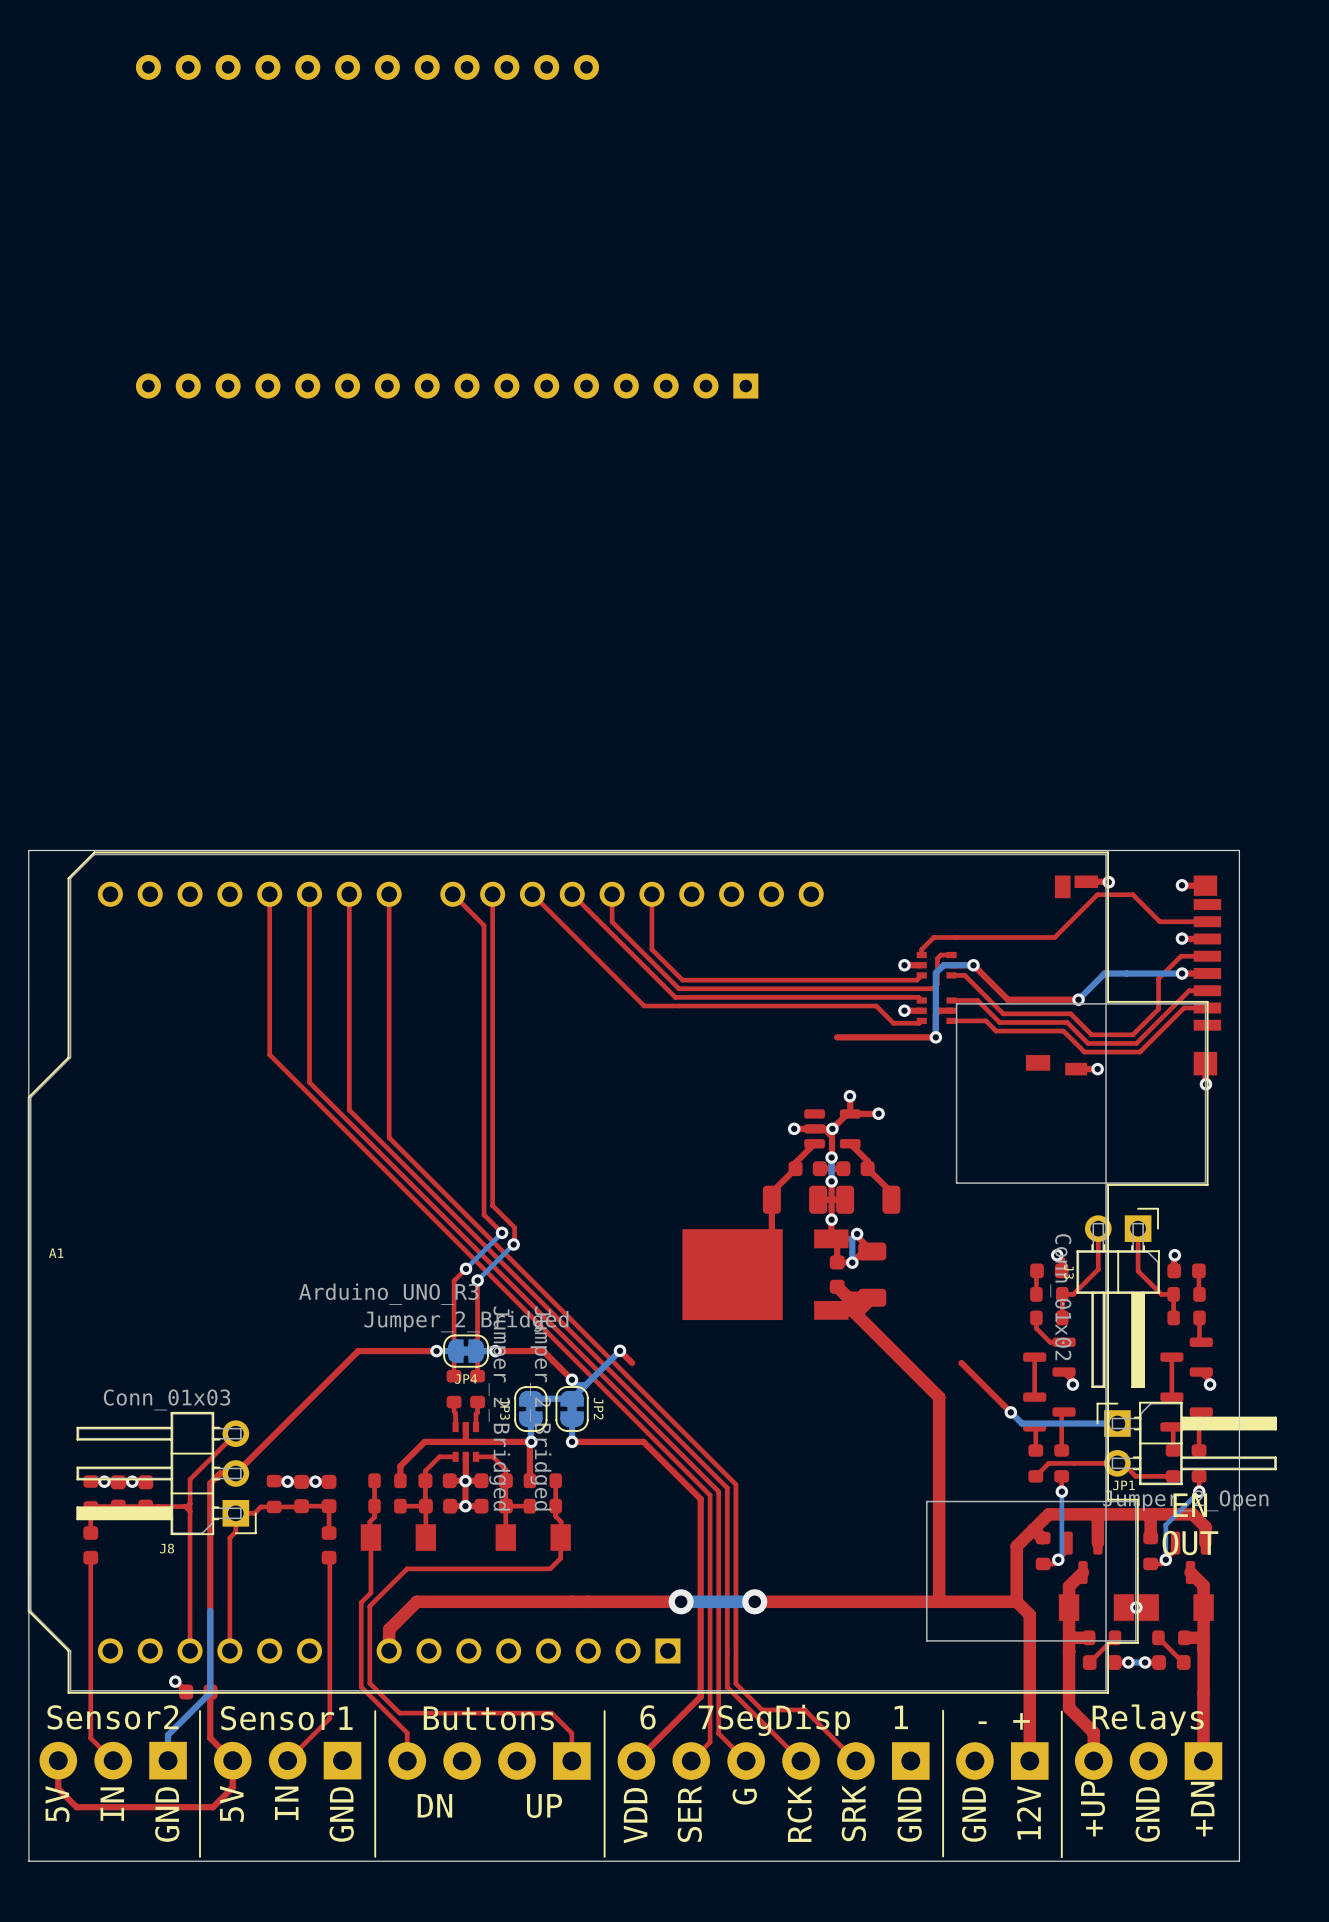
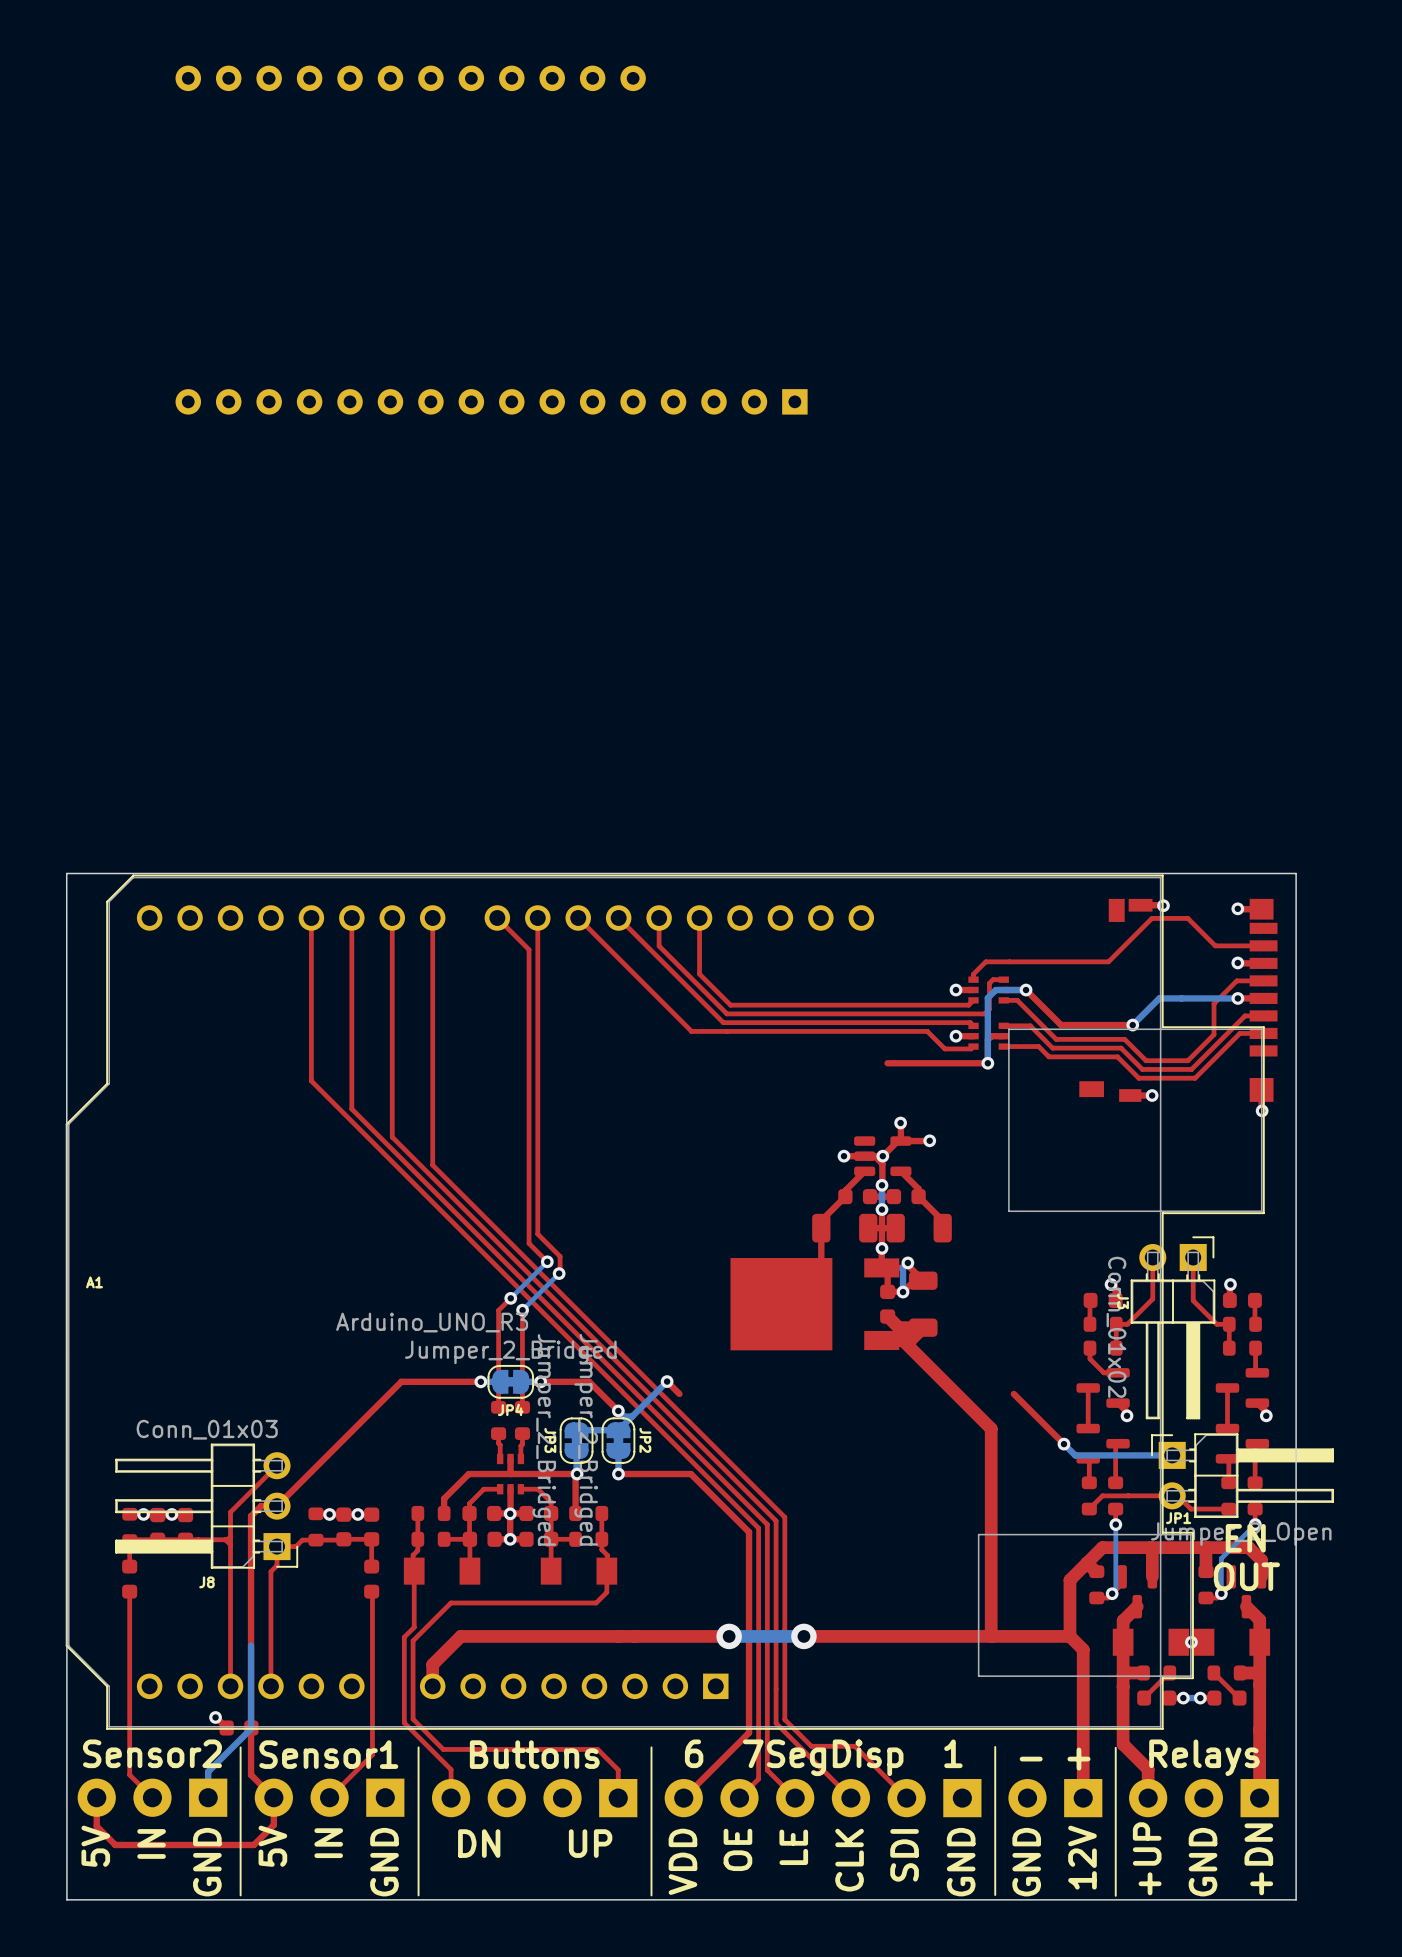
text: G (744, 1796) -> LE (793, 1847)
text: SRK (853, 1813) -> SDI (904, 1855)
text: SER (689, 1814) -> OE (737, 1849)
text: RCK (799, 1814) -> CLK (849, 1860)

